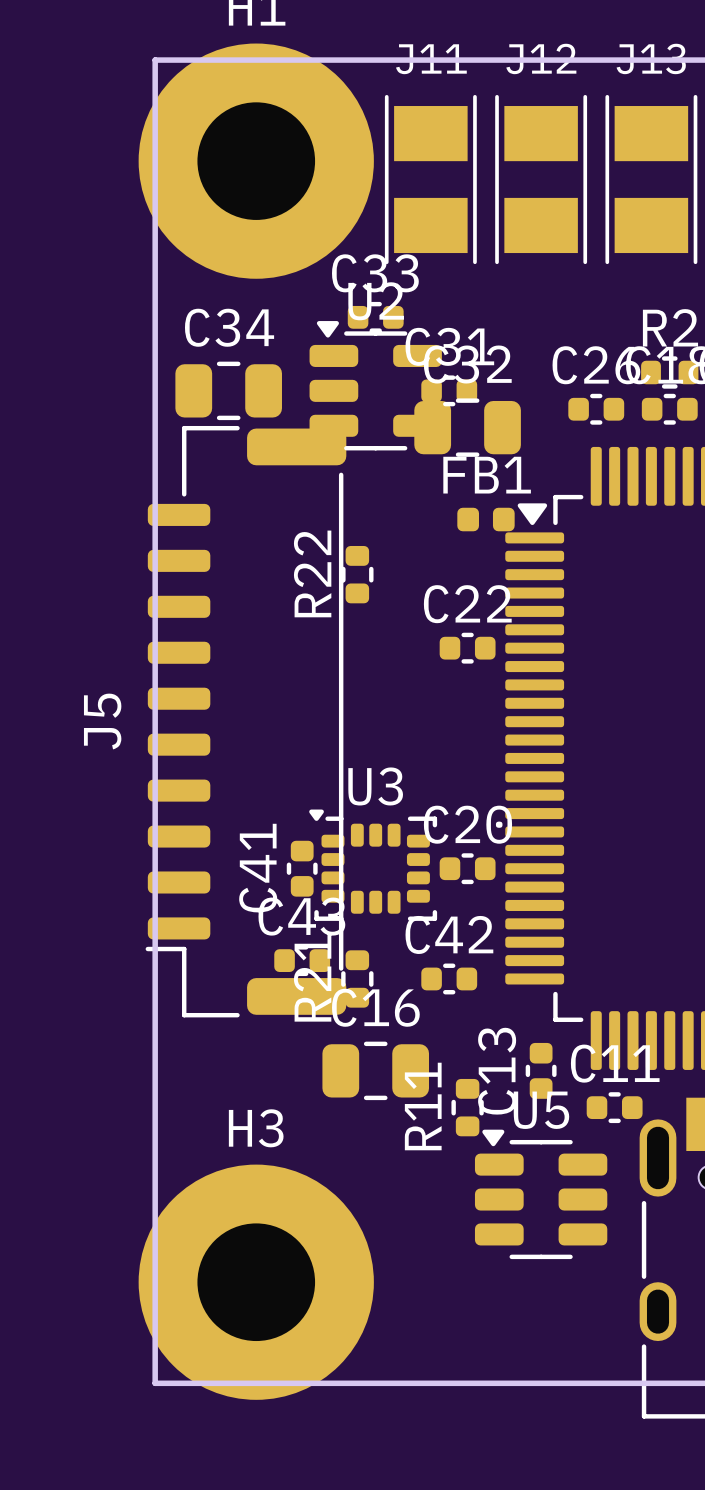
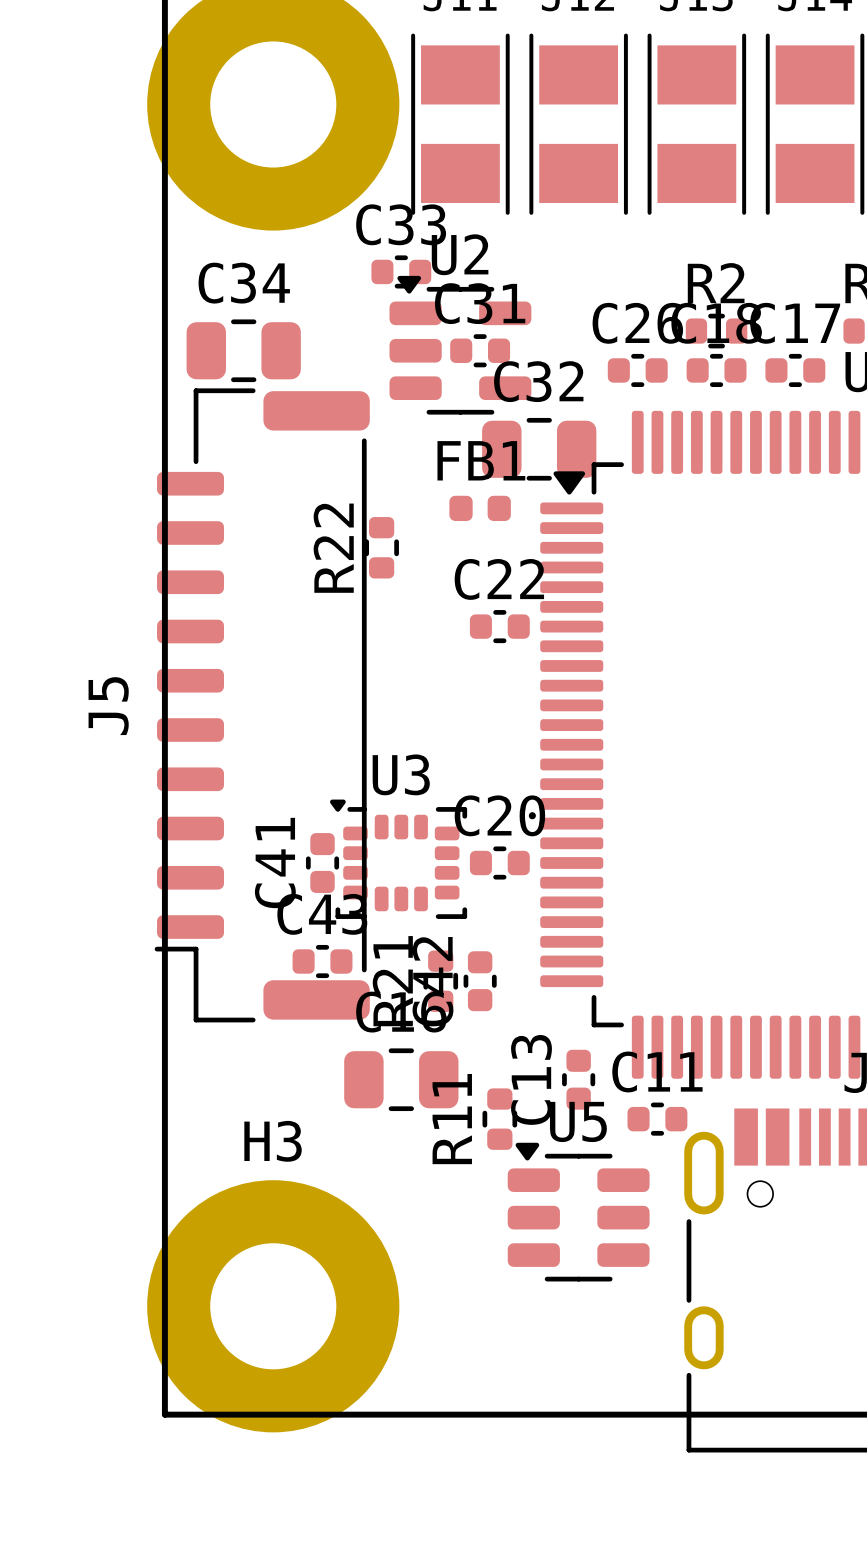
U2 position: (375, 385) -> (460, 345)
C32 position: (467, 427) -> (539, 449)
FB1 position: (485, 519) -> (480, 508)
R21 position: (357, 978) -> (440, 981)
C42 rotation: 0° (449, 978) -> 90° clockwise (480, 981)

